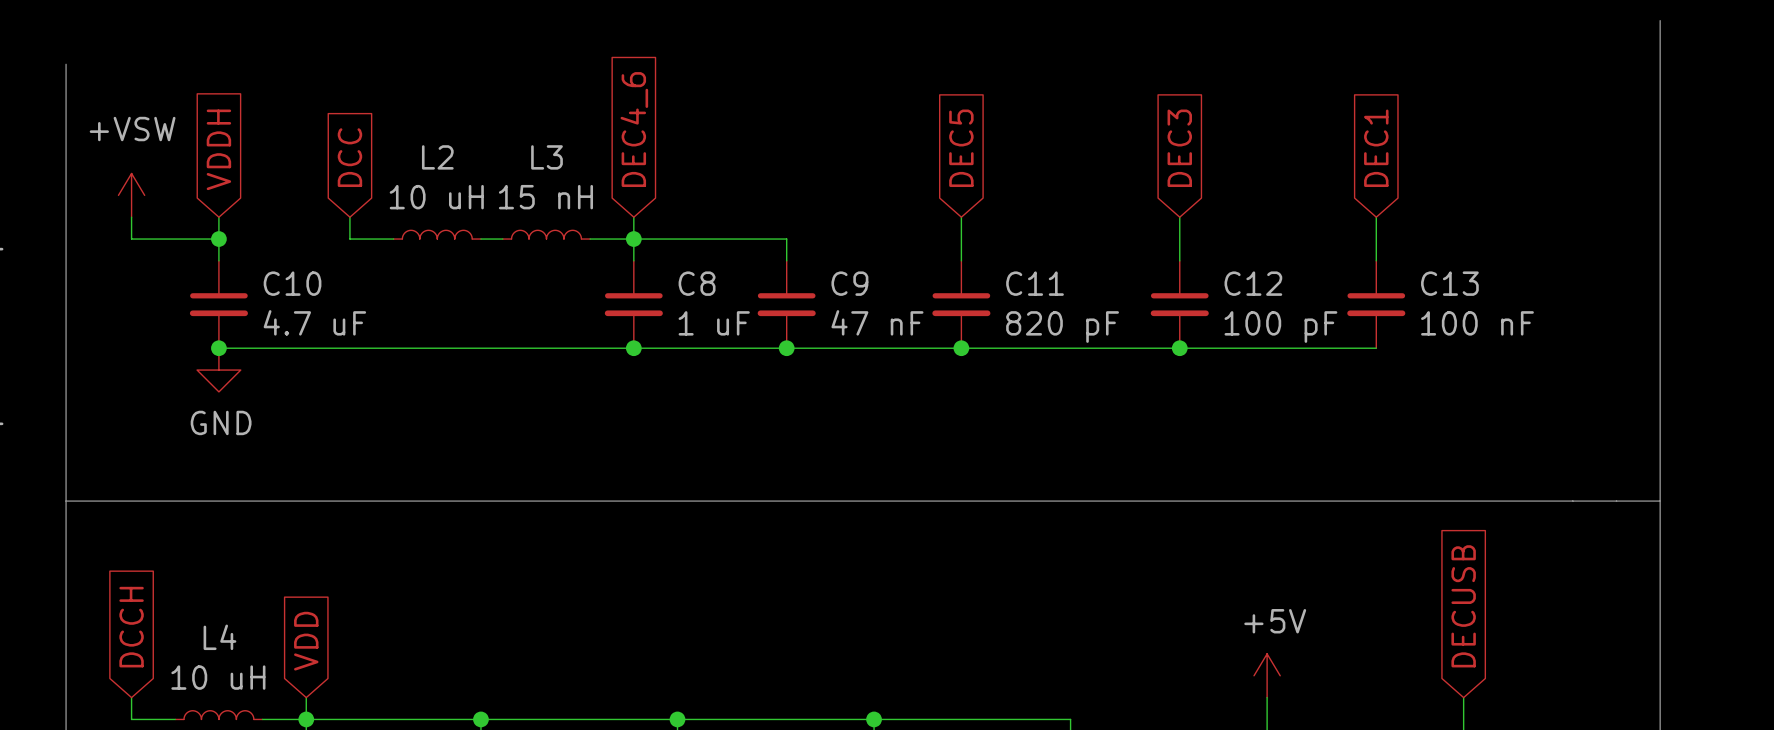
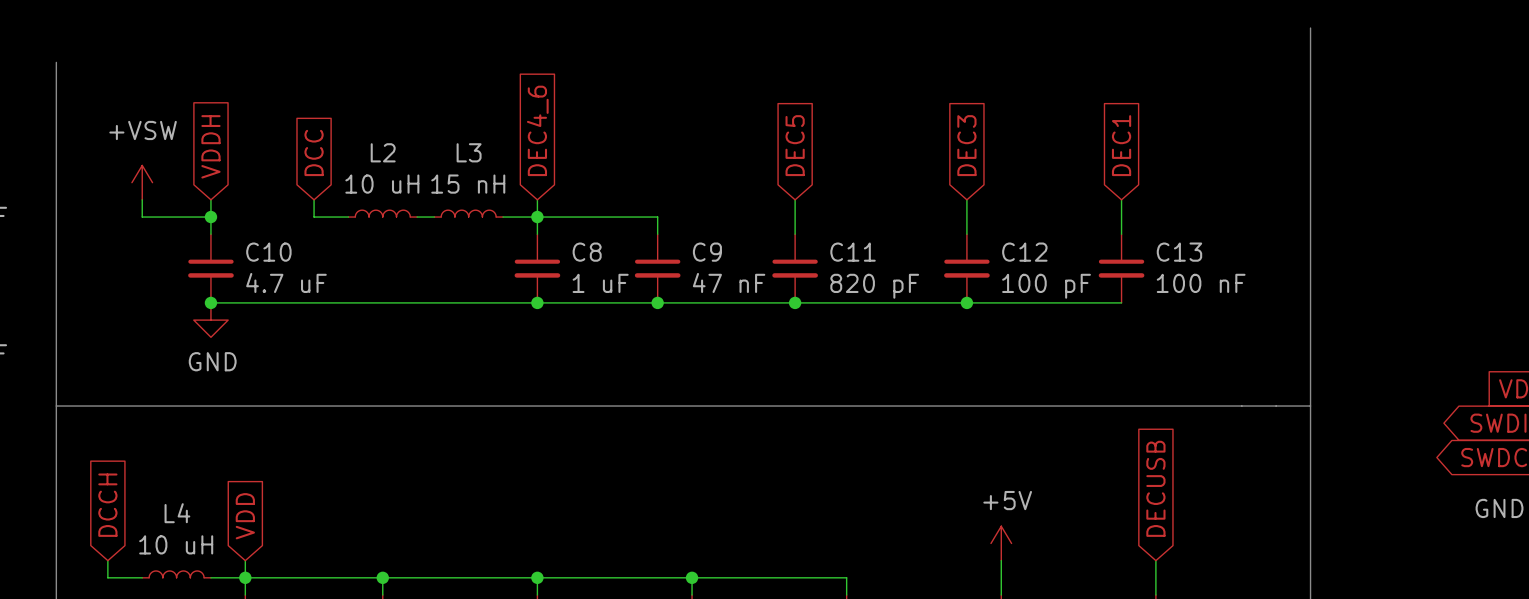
global label position: DEC4_6 (634, 129) -> DEC4_6 (537, 130)
global label position: DEC5 (961, 148) -> DEC5 (795, 145)
global label position: DEC3 (1179, 148) -> DEC3 (966, 145)
global label position: DEC1 (1376, 148) -> DEC1 (1121, 145)
global label position: VDDH (218, 149) -> VDDH (210, 146)
global label position: DCC (349, 157) -> DCC (314, 152)
power symbol position: +VSW (131, 195) -> +VSW (142, 182)
wire: (131, 217) (131, 239) (218, 239) -> (142, 199) (142, 217) (210, 217)
wire: (218, 217) (218, 260) -> (210, 199) (210, 234)
wire: (349, 217) (349, 239) (393, 239) -> (348, 217) (314, 217) (314, 199)
wire: (633, 217) (633, 260) -> (657, 234) (657, 217) (503, 217)
wire: (961, 217) (961, 260) -> (795, 199) (795, 234)
wire: (1179, 217) (1179, 260) -> (966, 199) (966, 234)
wire: (1376, 217) (1376, 260) -> (1121, 199) (1121, 234)
L2 position: (437, 234) -> (382, 213)
L3 position: (546, 234) -> (468, 213)
junction: (218, 239) -> none
wire: (480, 239) (502, 239) -> (417, 217) (434, 217)
wire: (590, 239) (786, 239) (786, 260) -> none
junction: (633, 239) -> none
wire: none -> (537, 199) (537, 234)
junction: none -> (210, 217)
junction: none -> (537, 217)
C10 position: (218, 304) -> (210, 268)
C8 position: (633, 304) -> (537, 268)
C9 position: (786, 304) -> (657, 268)
C11 position: (961, 304) -> (795, 268)
C12 position: (1179, 304) -> (966, 268)
C13 position: (1376, 304) -> (1121, 268)
wire: (218, 348) (1376, 348) -> (210, 302) (1121, 302)
junction: (218, 348) -> none
junction: (633, 348) -> none
junction position: (786, 348) -> (657, 302)
junction position: (961, 348) -> (795, 302)
junction position: (1179, 348) -> (966, 302)
power symbol position: GND (218, 370) -> GND (210, 320)
junction: none -> (210, 302)
junction: none -> (537, 302)

